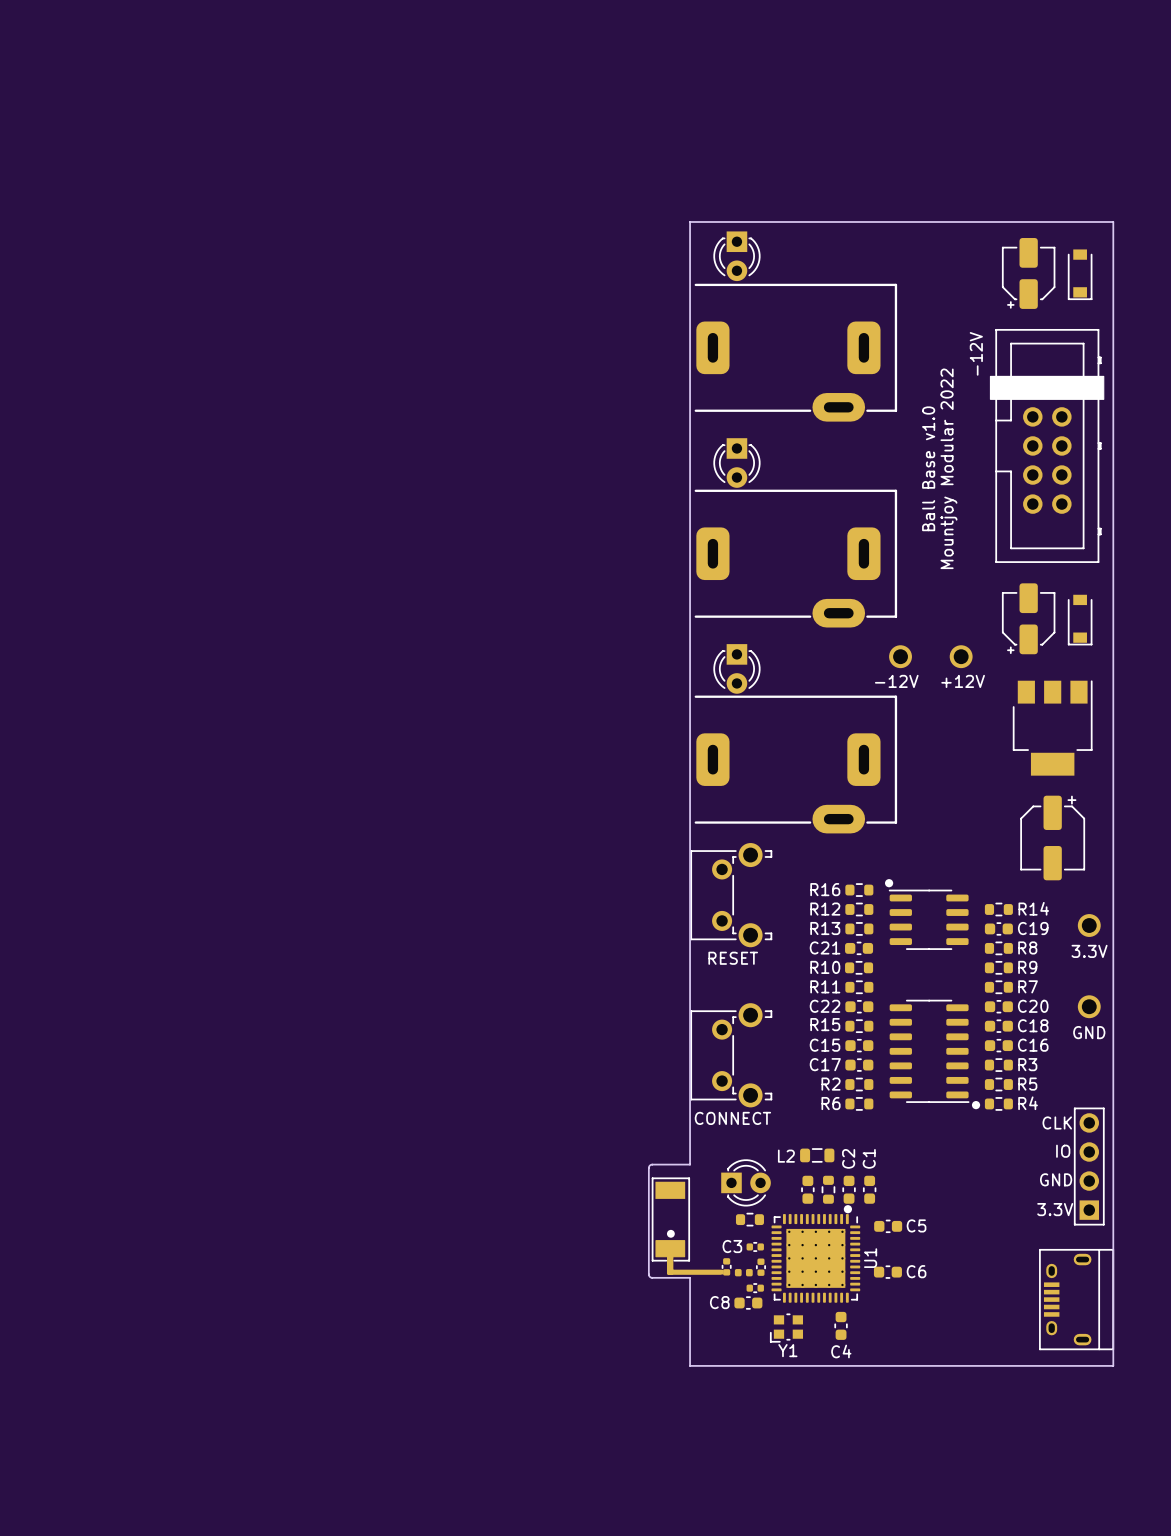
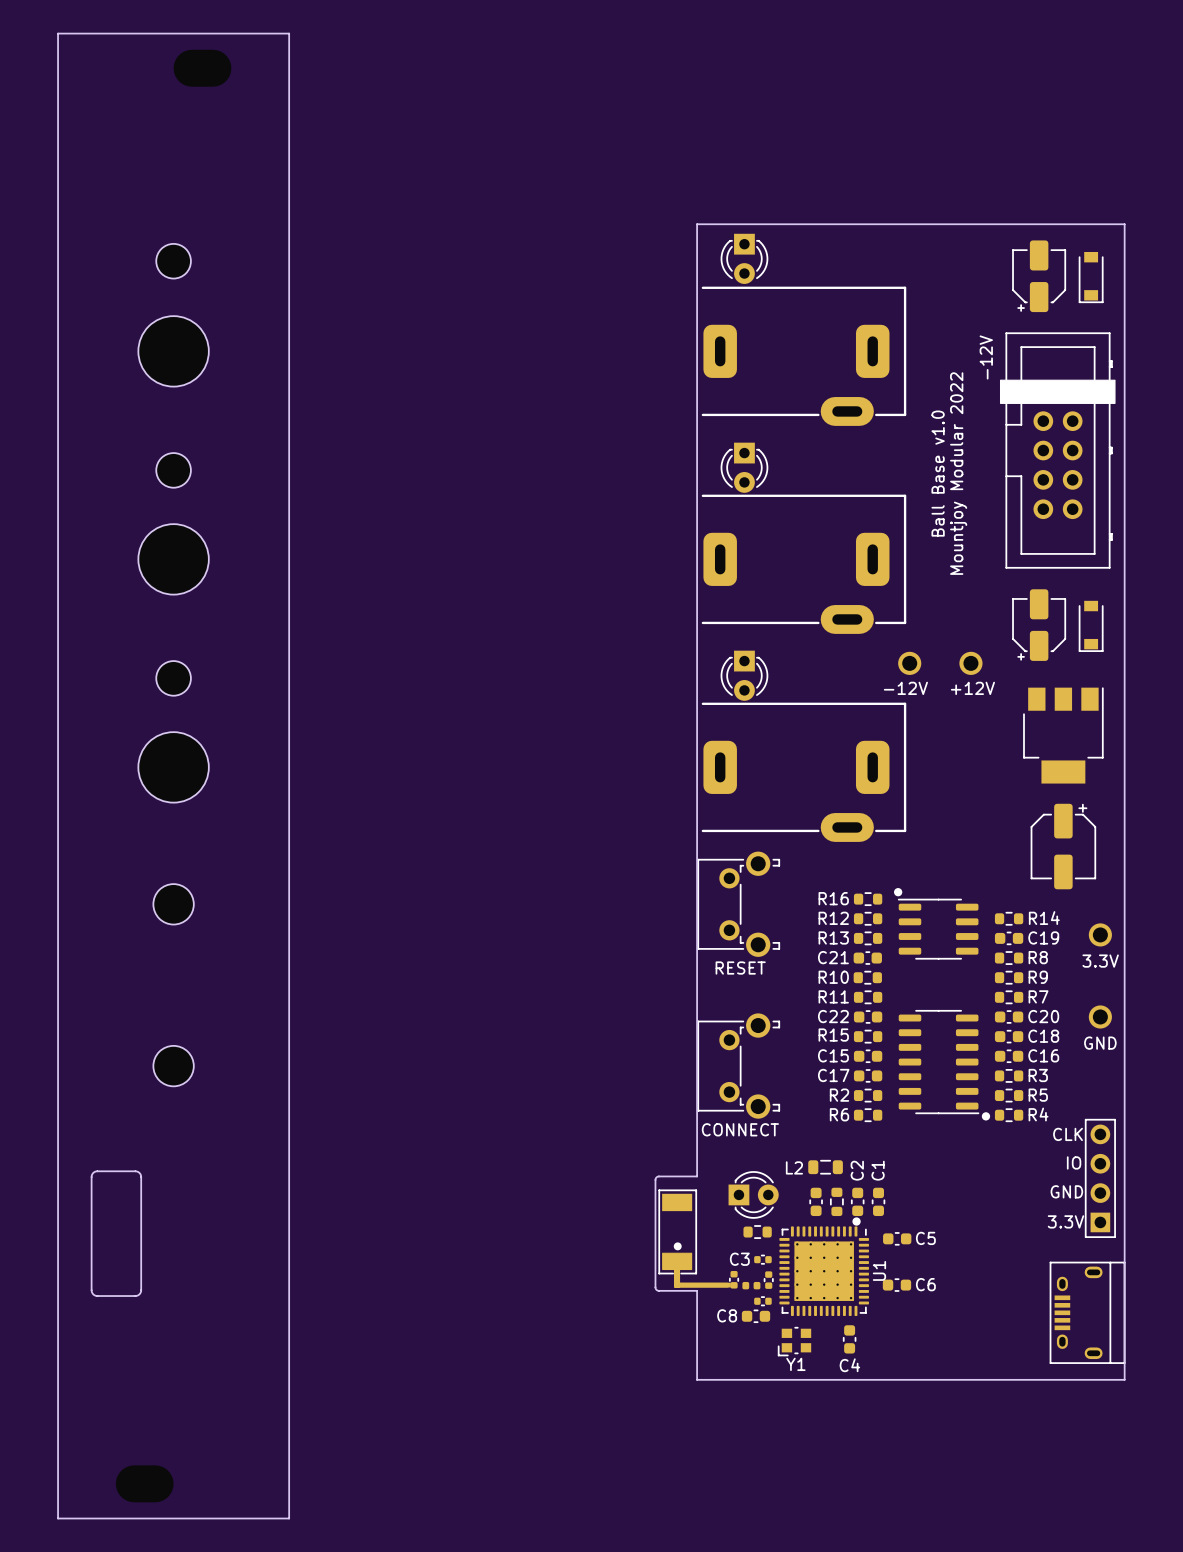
board edge: none -> (58, 33) (289, 33) (289, 1518) (58, 1518) (58, 33)
part: none -> (202, 68)
part: none -> (173, 261)
part: none -> (173, 351)
part: none -> (173, 470)
part: none -> (173, 559)
part: none -> (173, 678)
part: none -> (173, 767)
part: none -> (173, 904)
part: none -> (173, 1066)
board edge: none -> (97, 1171) (136, 1171) (141, 1175) (141, 1290) (136, 1295) (96, 1295) (91, 1291) (91, 1177) (93, 1172) (97, 1171)
part: none -> (144, 1483)

